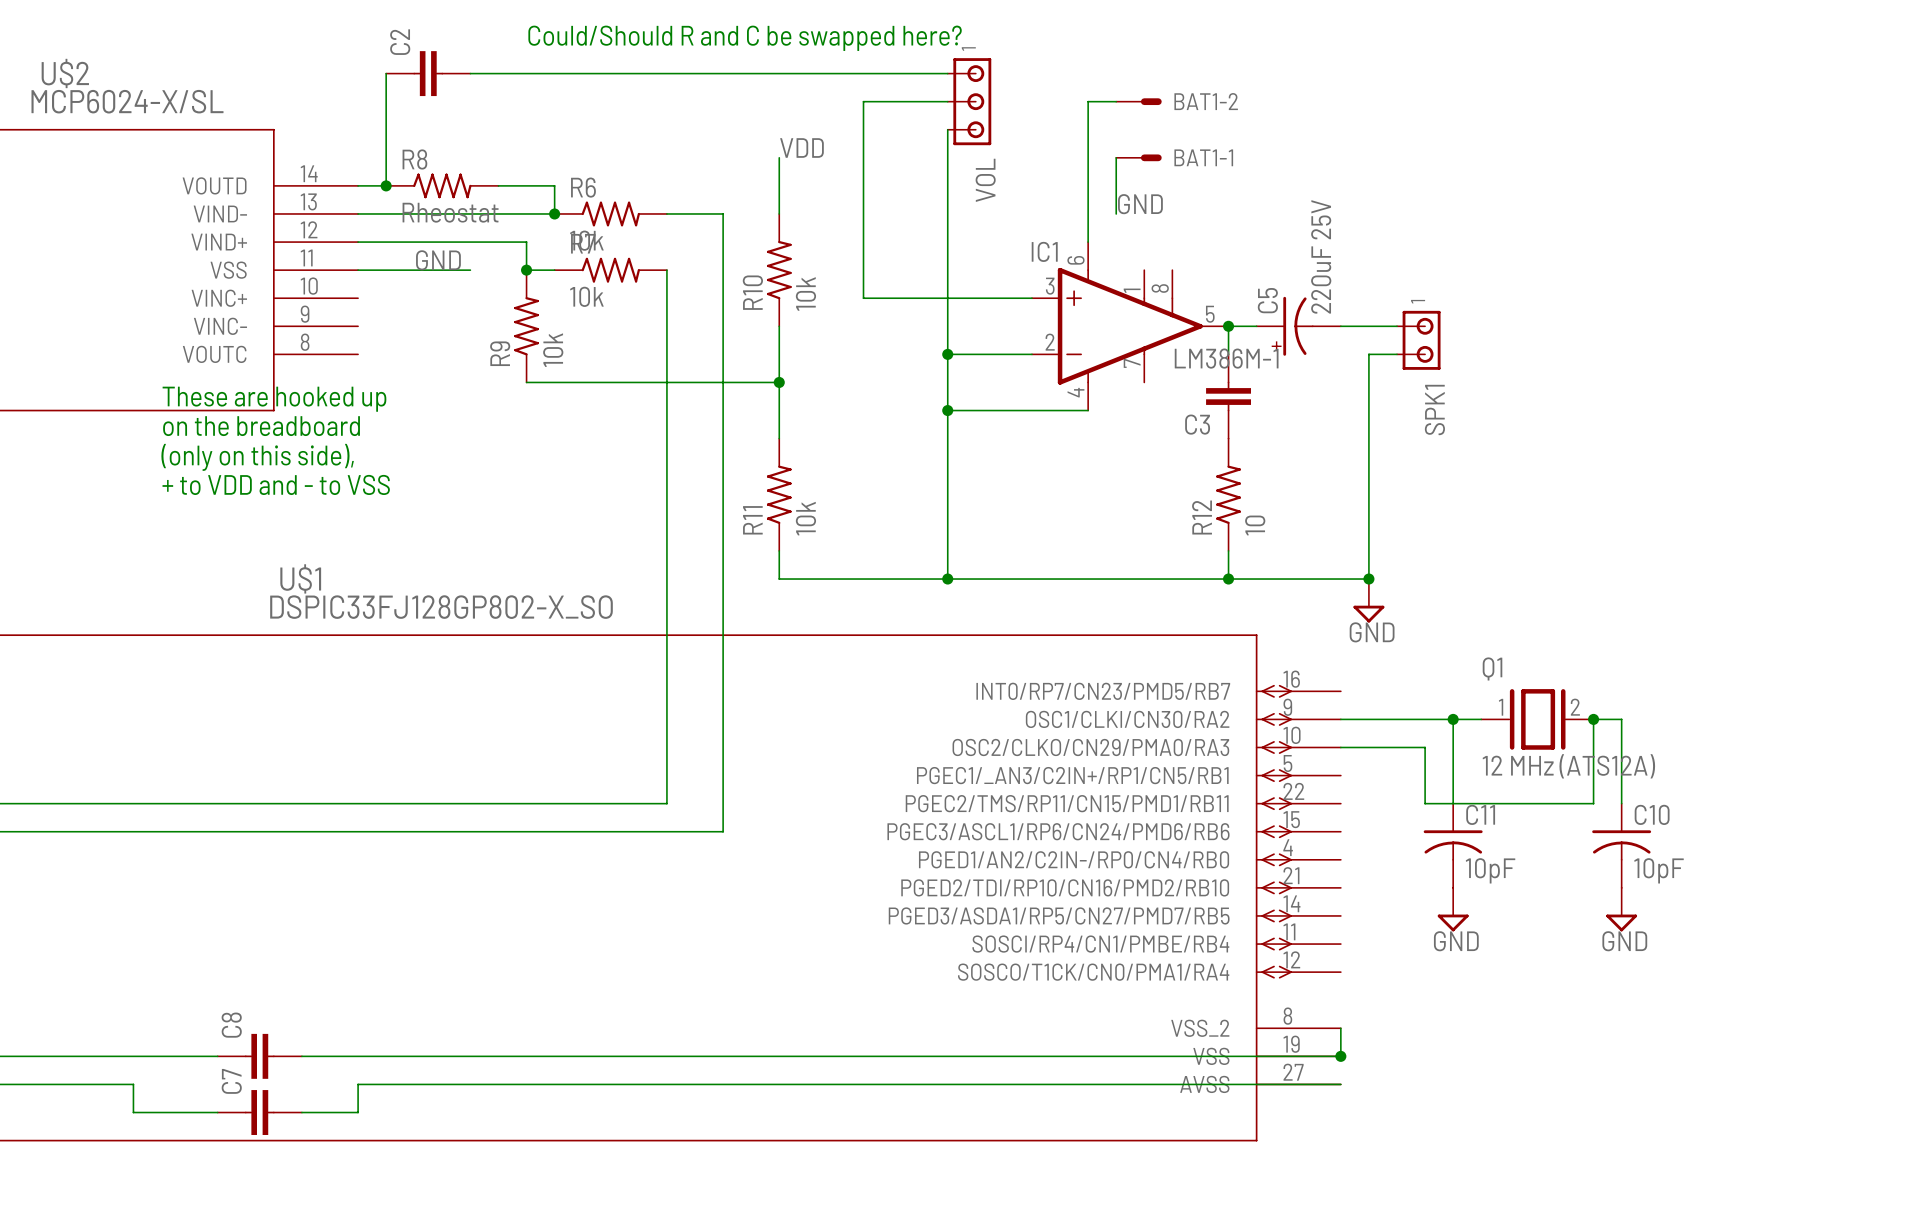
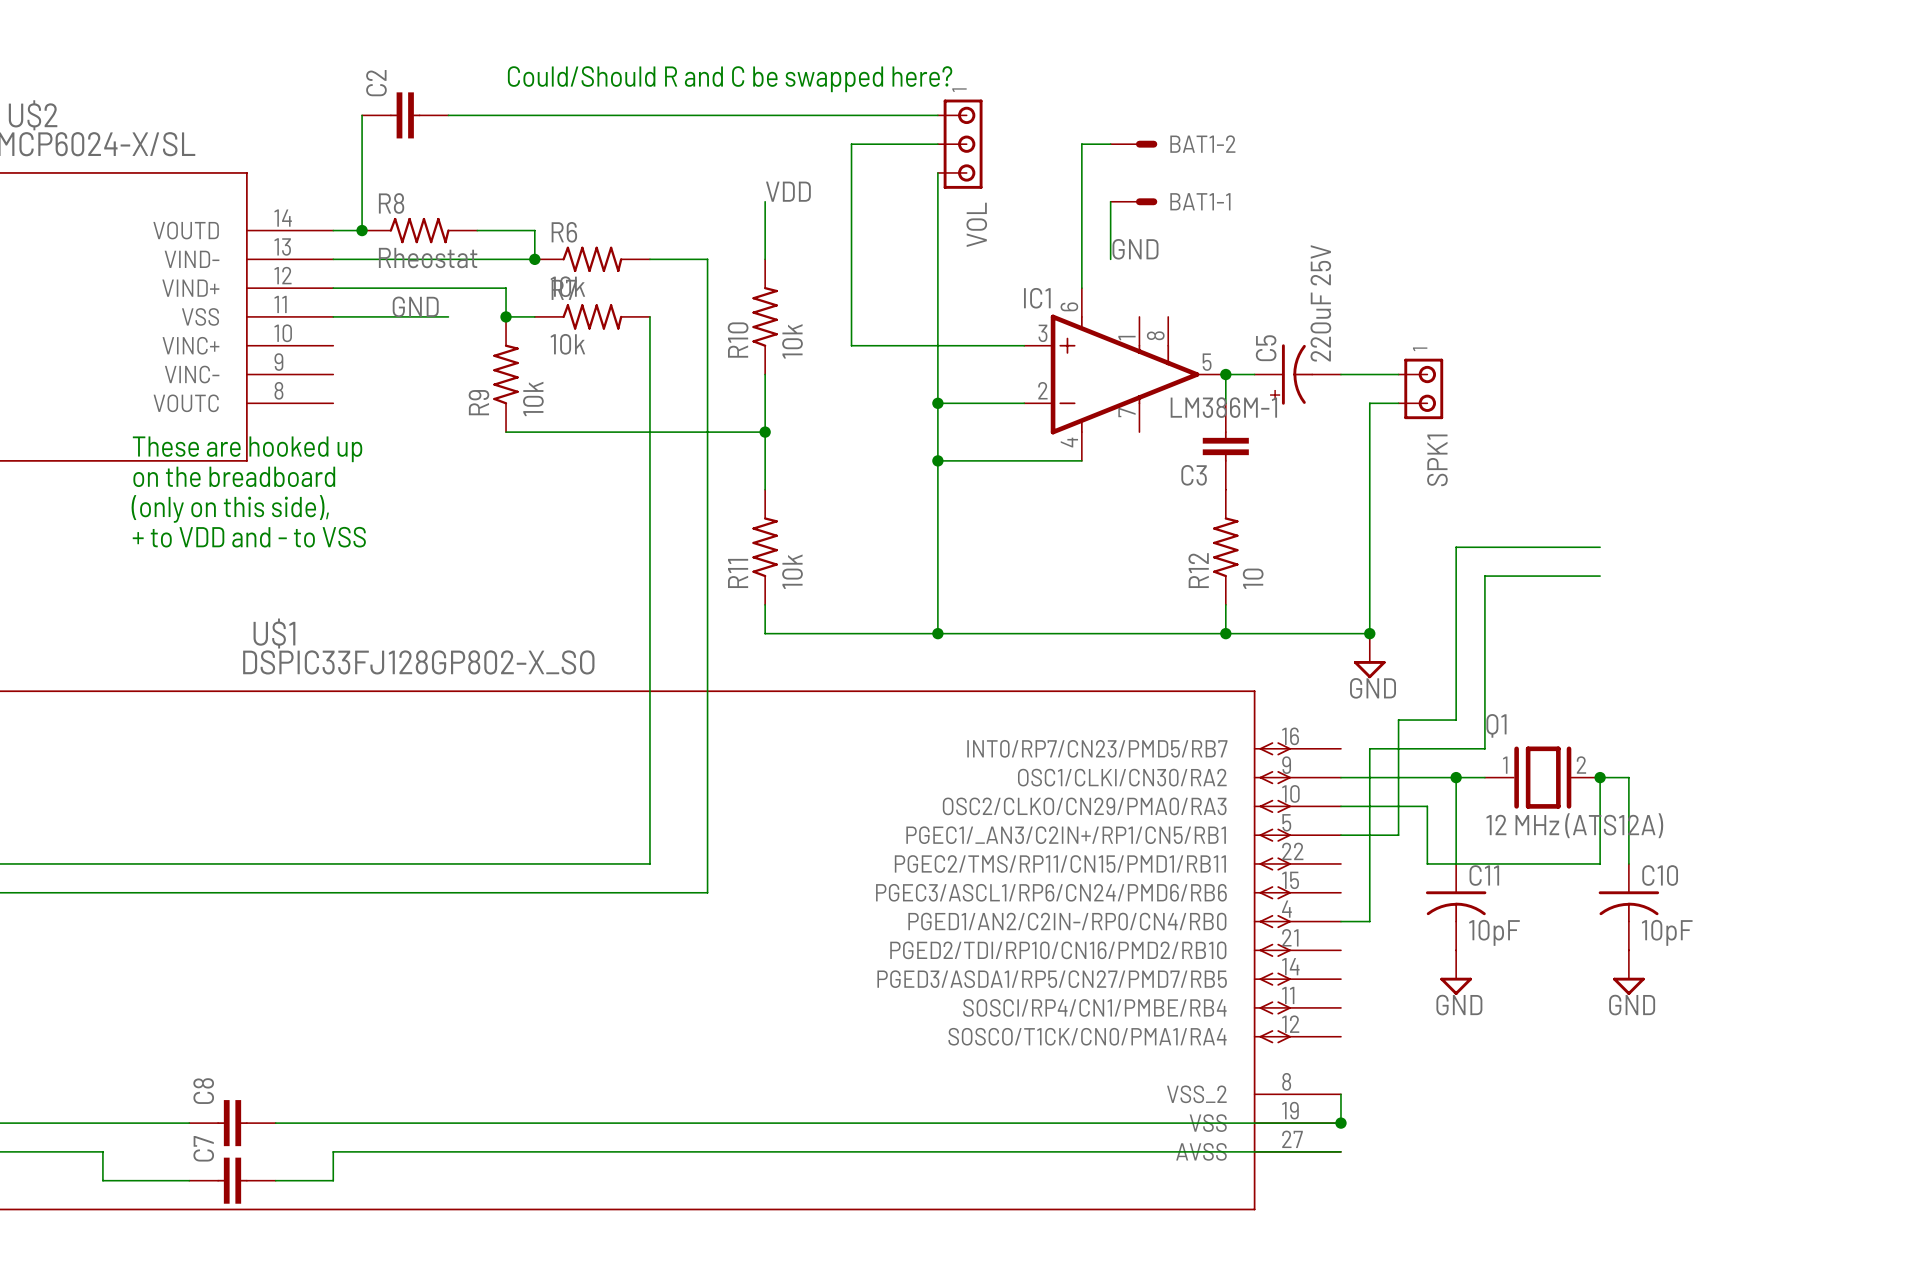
wire: none -> (1600, 547) (1456, 547) (1456, 720) (1398, 720) (1398, 835) (1340, 835)
wire: none -> (1600, 576) (1484, 576) (1484, 748) (1369, 748) (1369, 921) (1340, 921)

